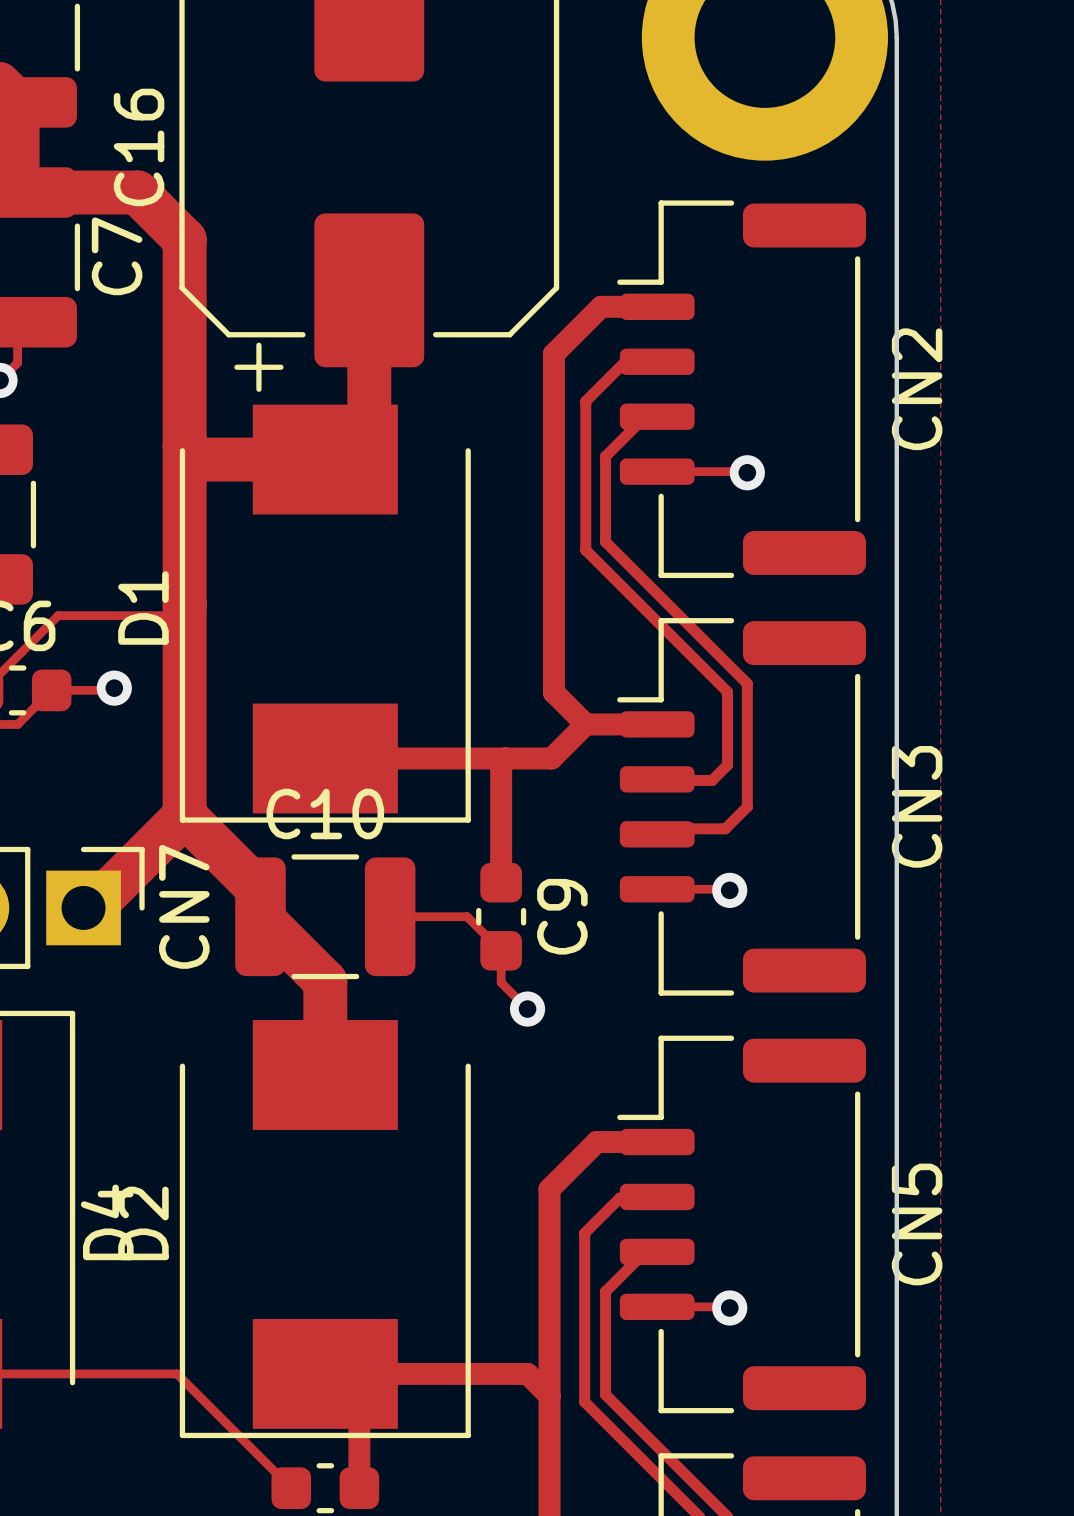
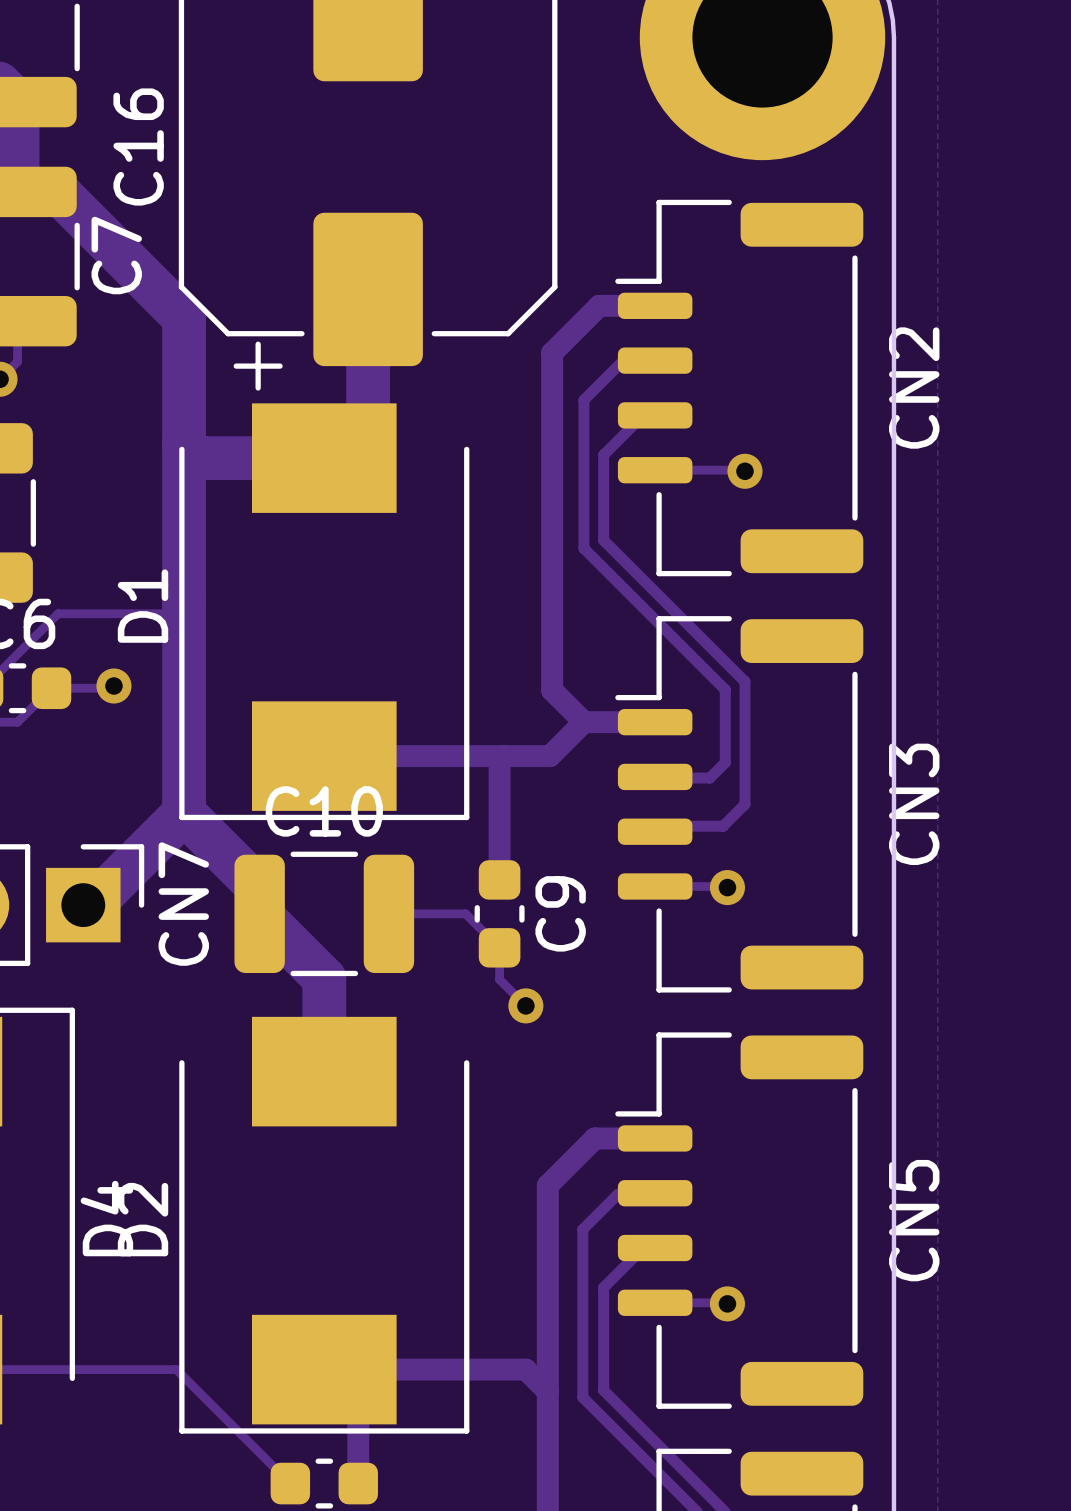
track: (58, 192) (137, 192) (184, 239) (184, 318) -> (58, 191) (184, 317)

